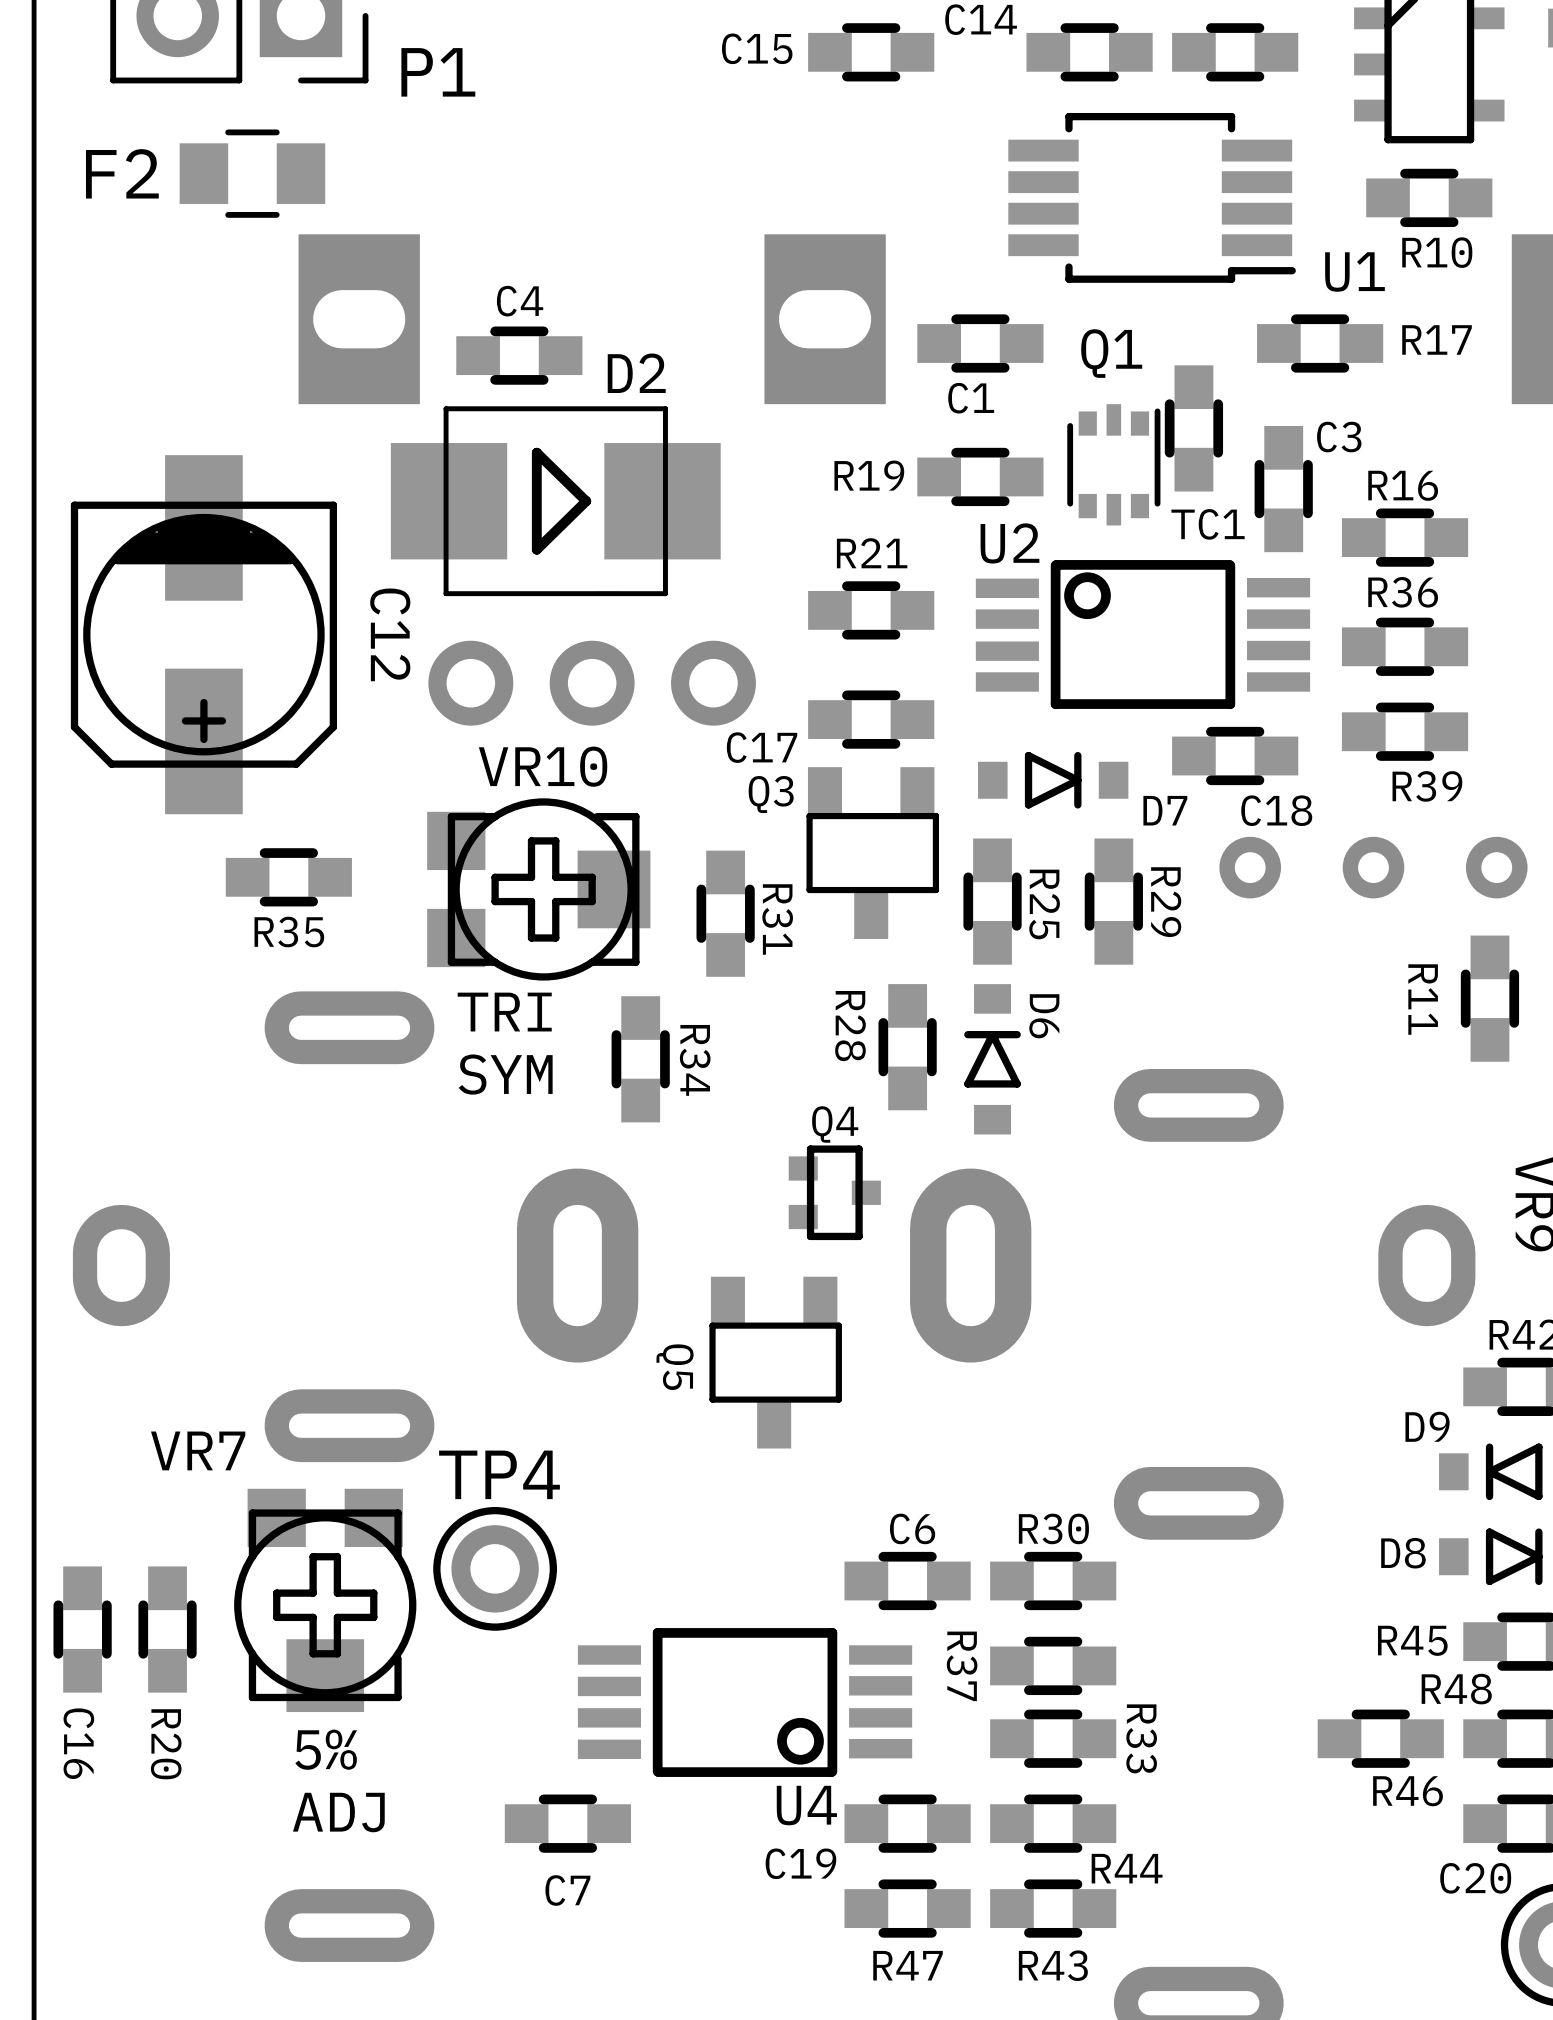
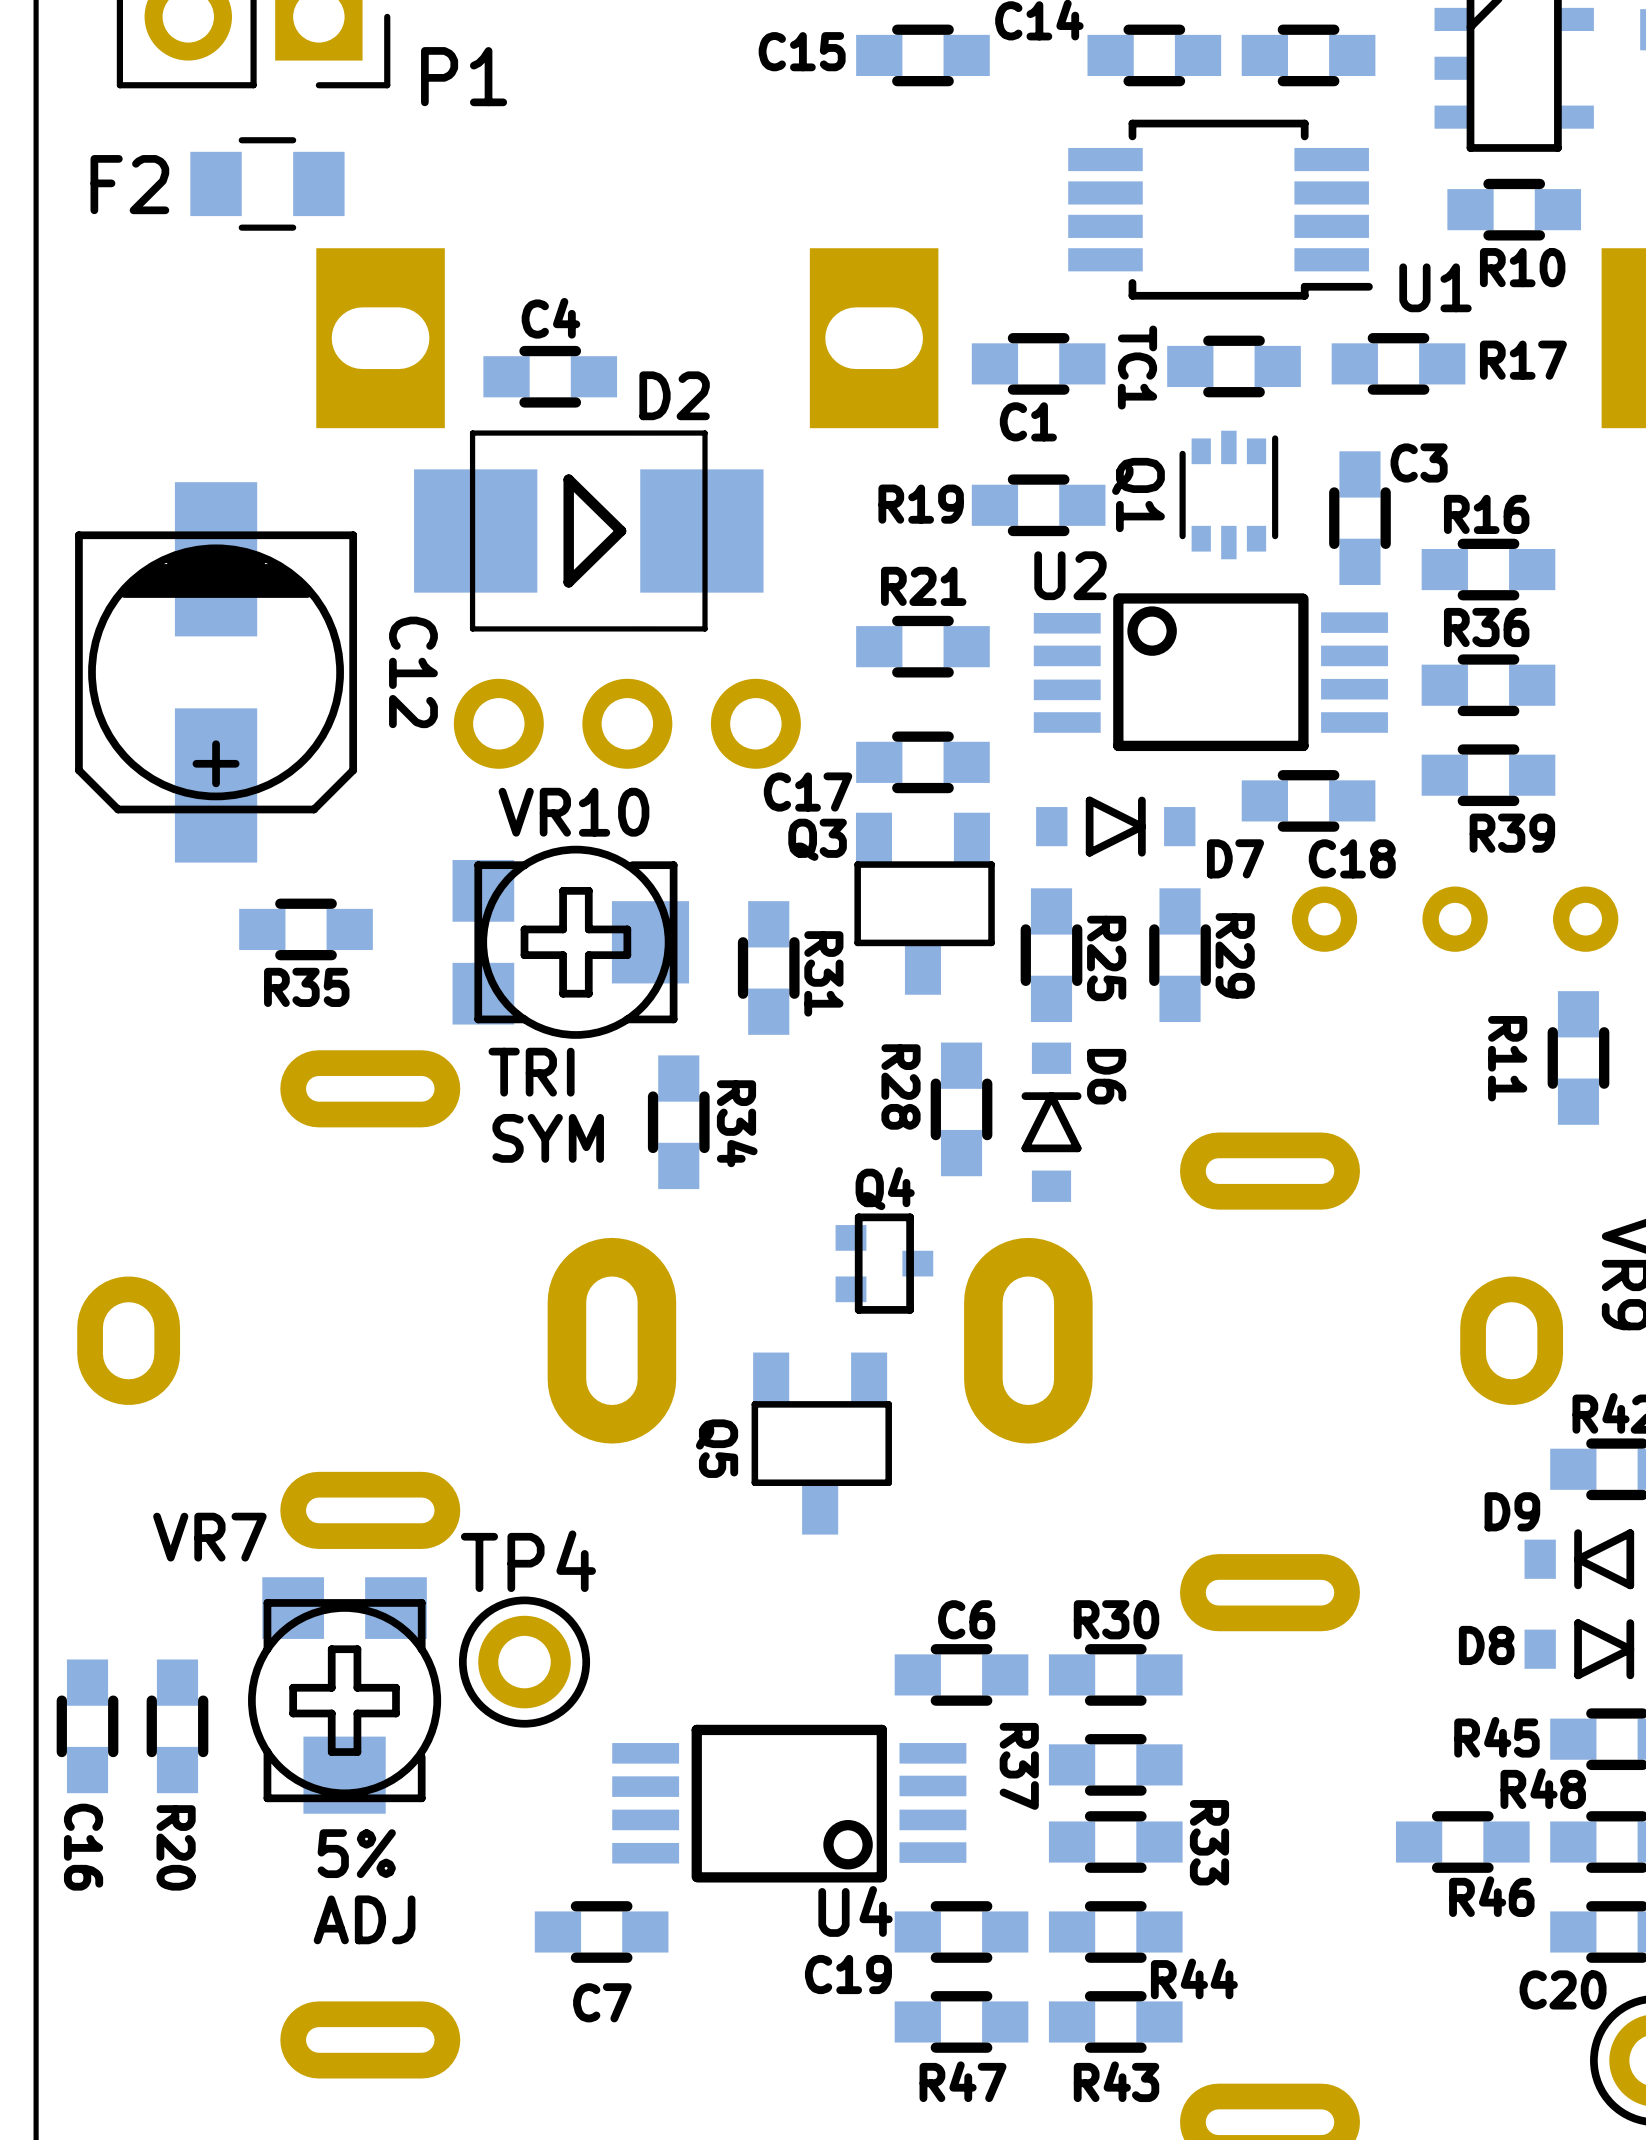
Q1 name rotation: 0° (1111, 353) -> 90° clockwise (1138, 495)
Q1 name position: Q1 (1111, 353) -> Q1 (1138, 495)
TC1 rotation: 0° (1193, 428) -> 90° clockwise (1234, 366)
TC1 position: (1193, 428) -> (1234, 366)
Q1 position: (1113, 464) -> (1228, 495)

